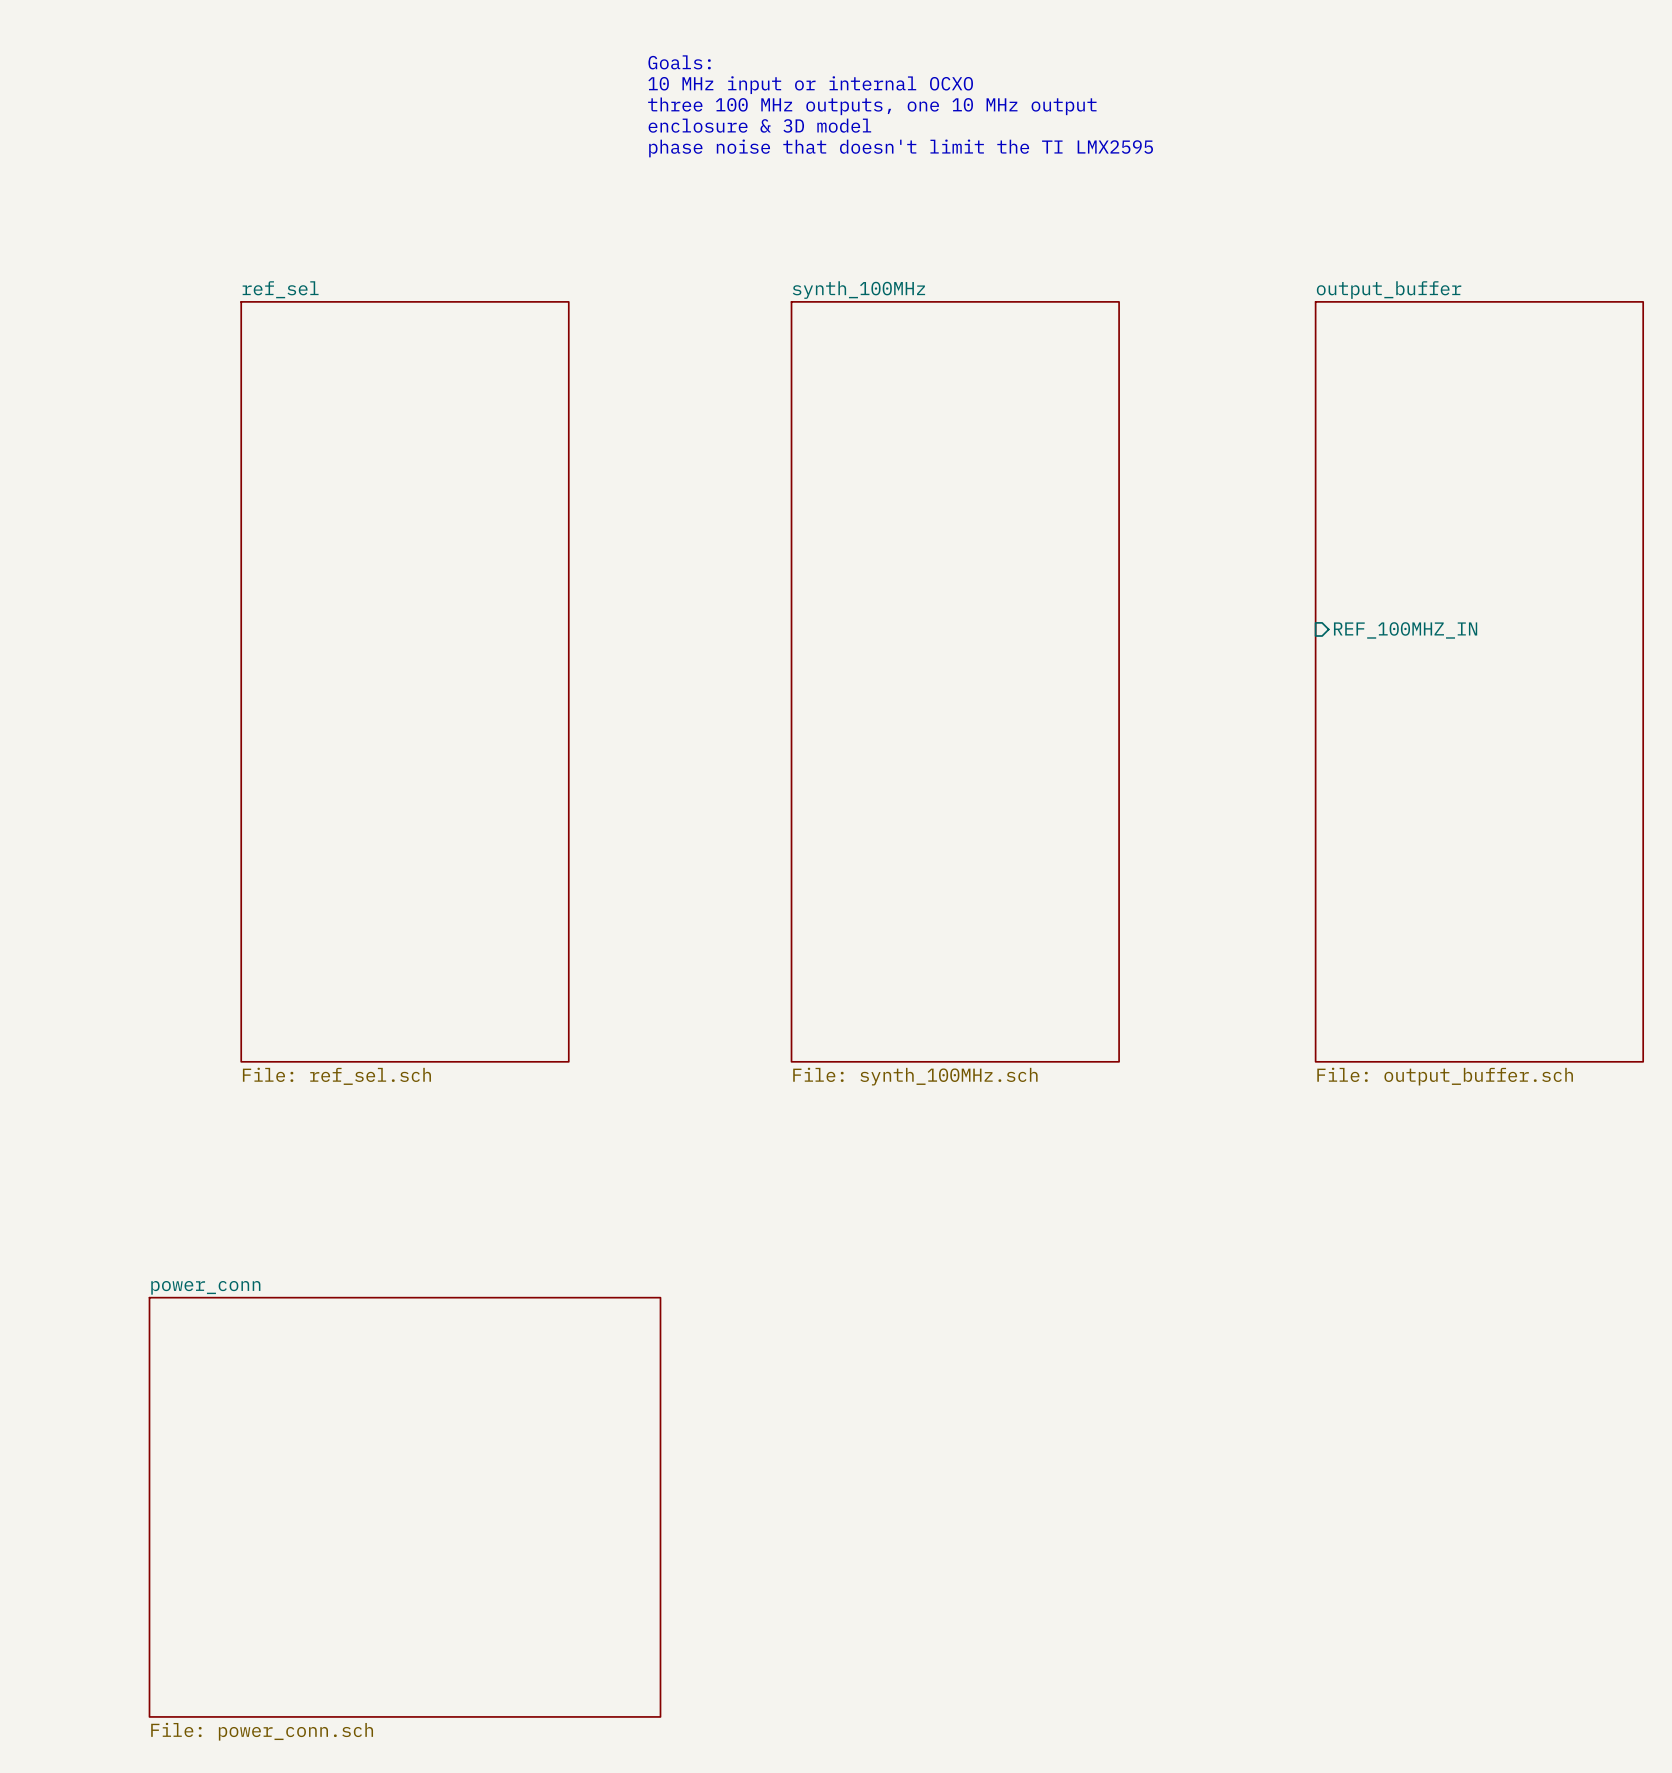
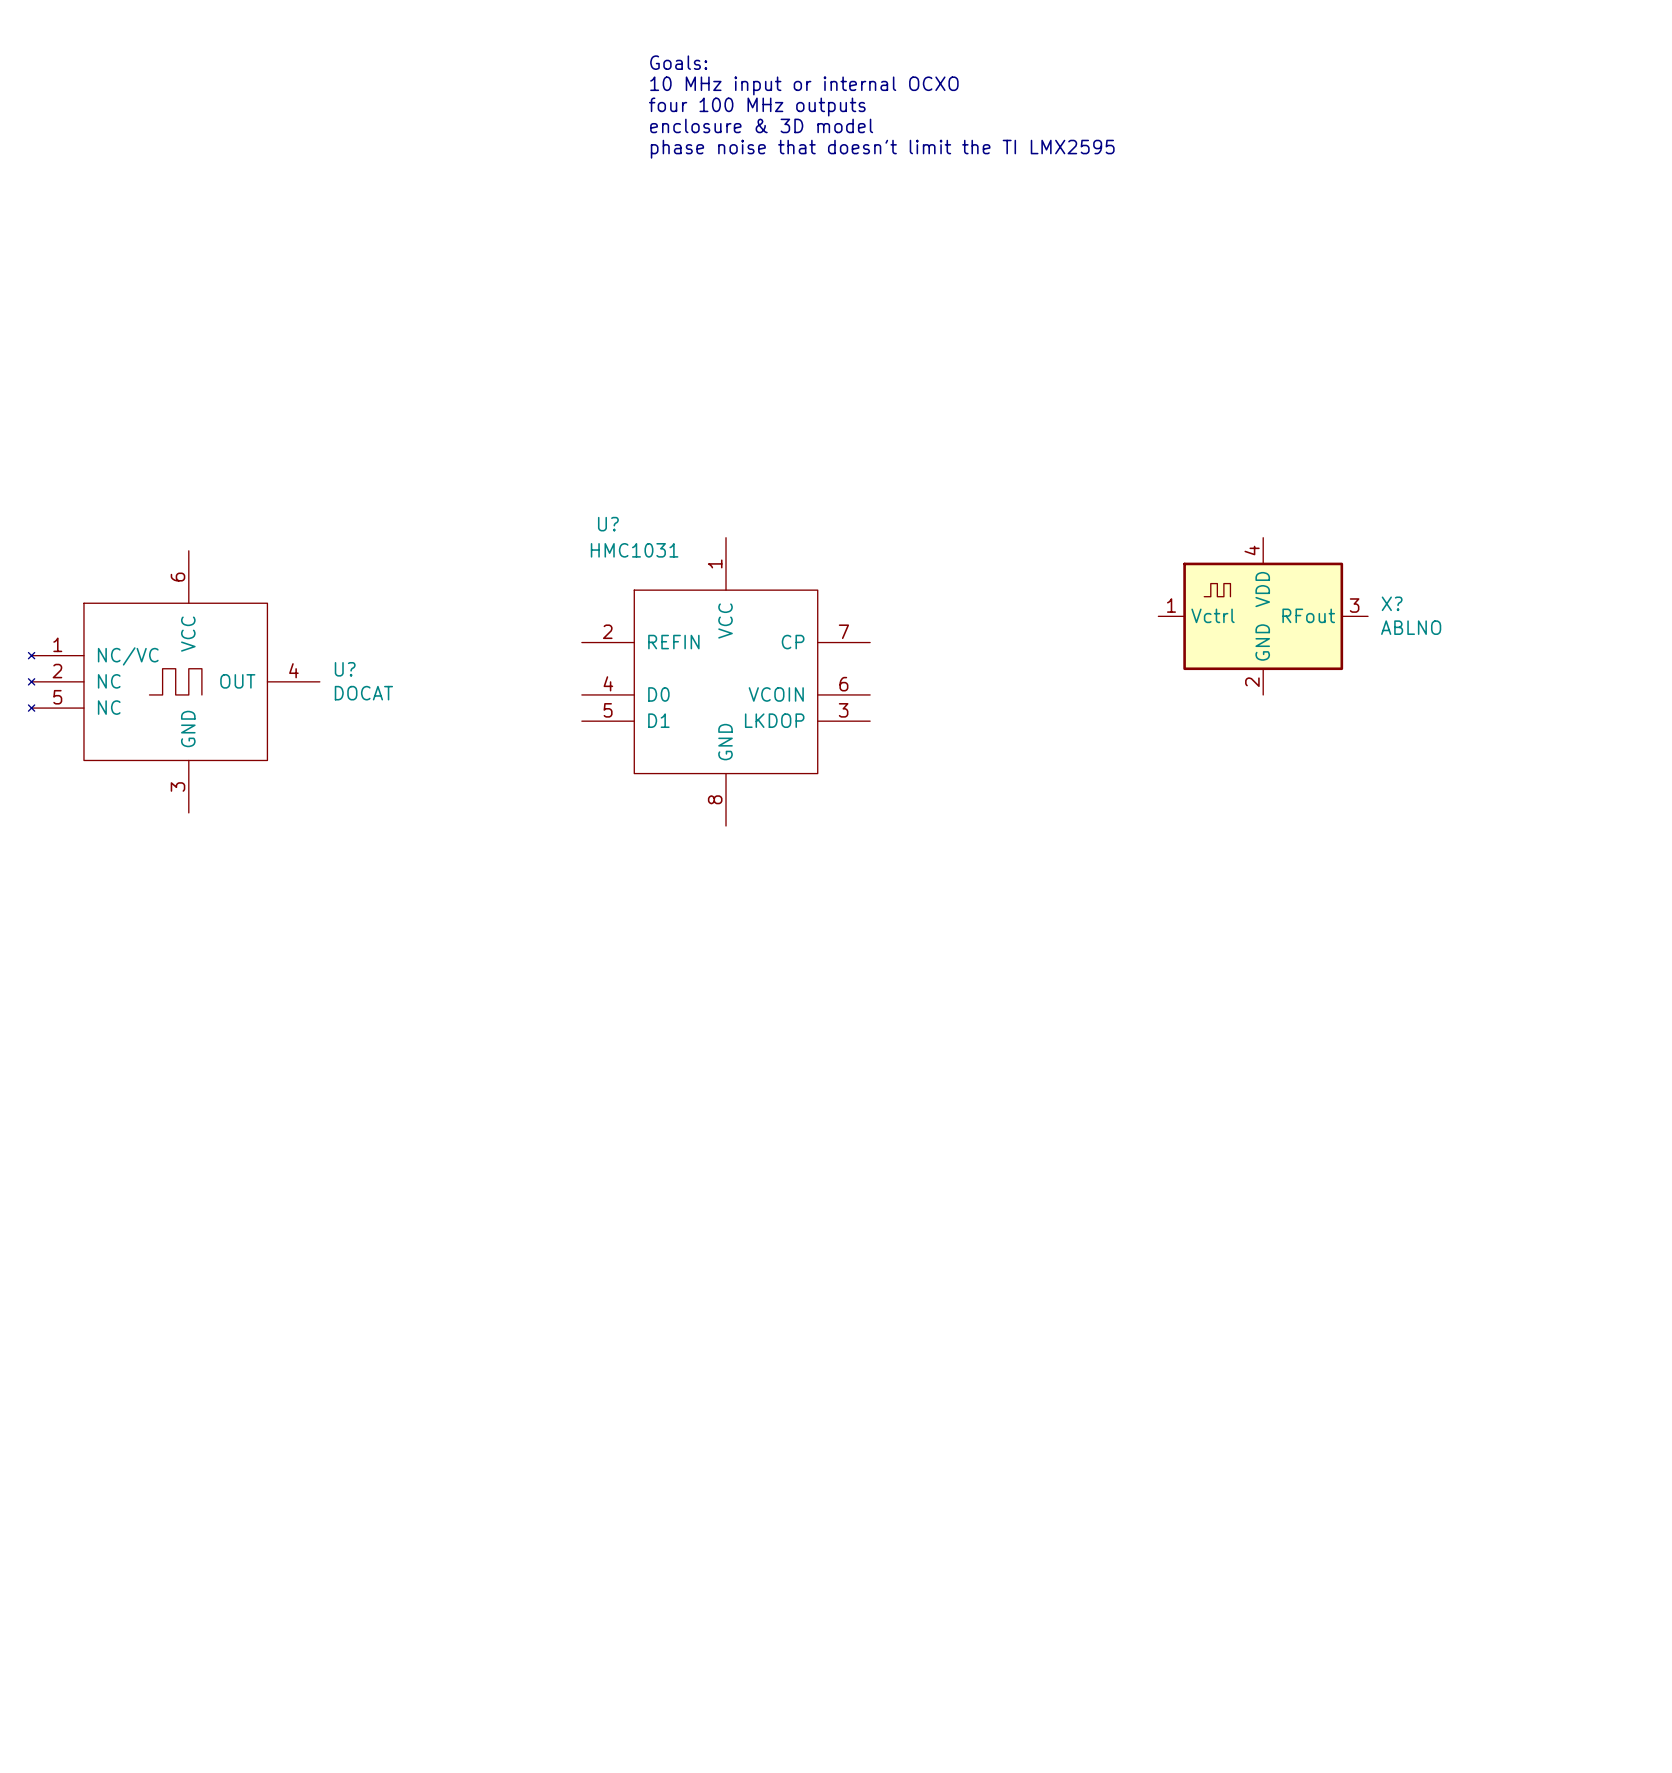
text: three 100 MHz outputs, one 10 MHz output (872, 106) -> four 100 MHz outputs (757, 107)
X?: none -> ABLNO (1263, 616)
sheet pin: REF_100MHZ_IN (1405, 630) -> none
U?: none -> DOCAT (174, 681)
sheet ref_sel: File: ref_sel.sch (404, 681) -> none
U?: none -> HMC1031 (726, 681)
sheet synth_100MHz: File: synth_100MHz.sch (955, 681) -> none
sheet output_buffer: File: output_buffer.sch (1479, 681) -> none
sheet power_conn: File: power_conn.sch (404, 1507) -> none

